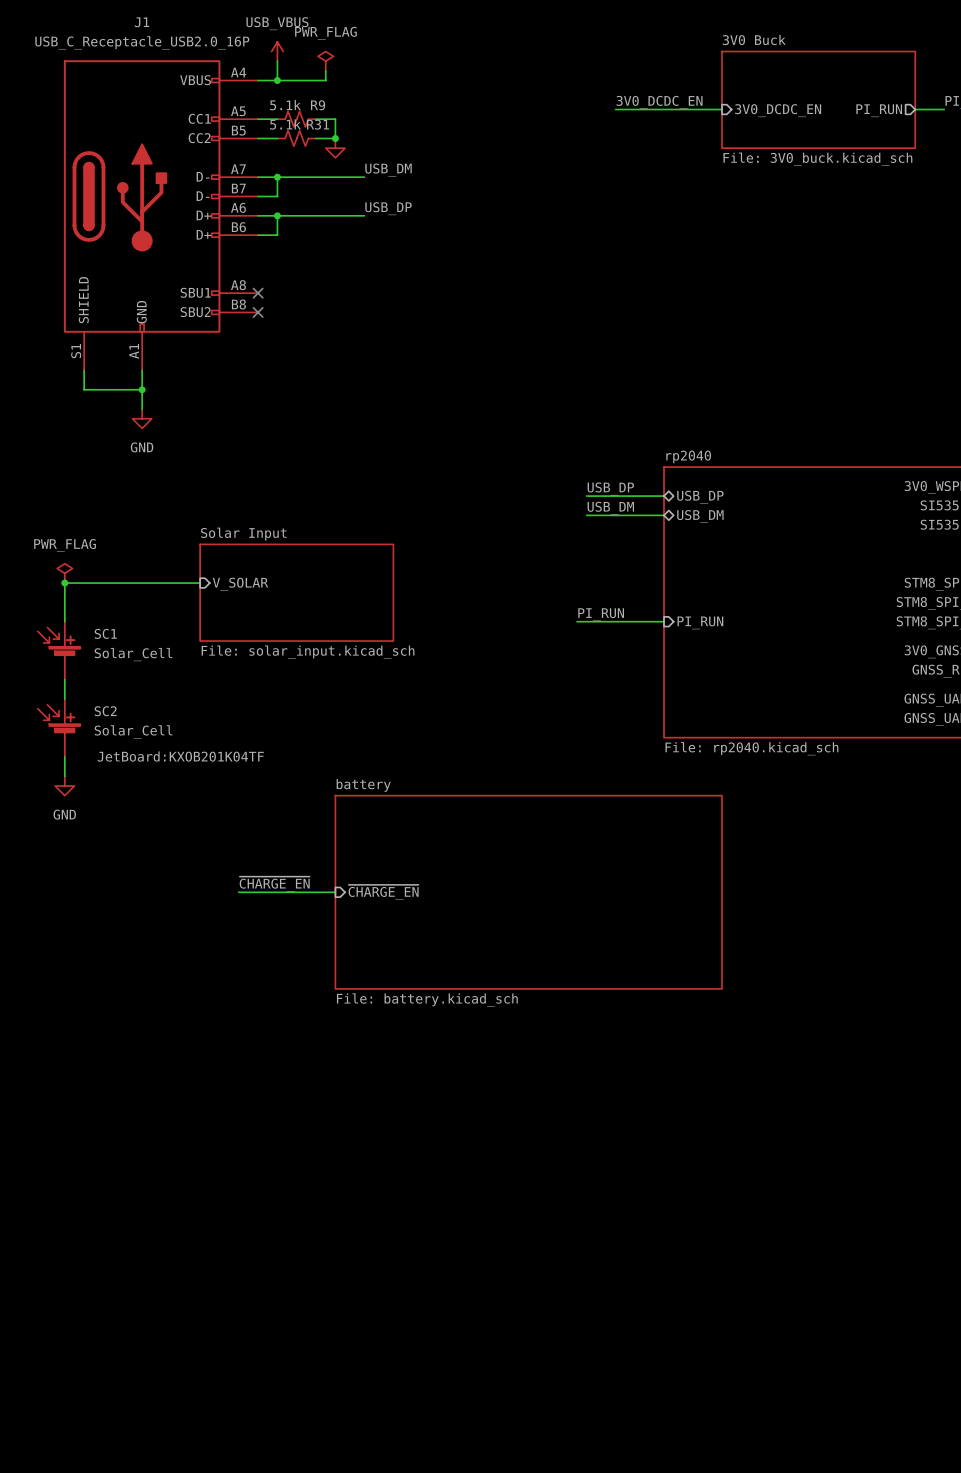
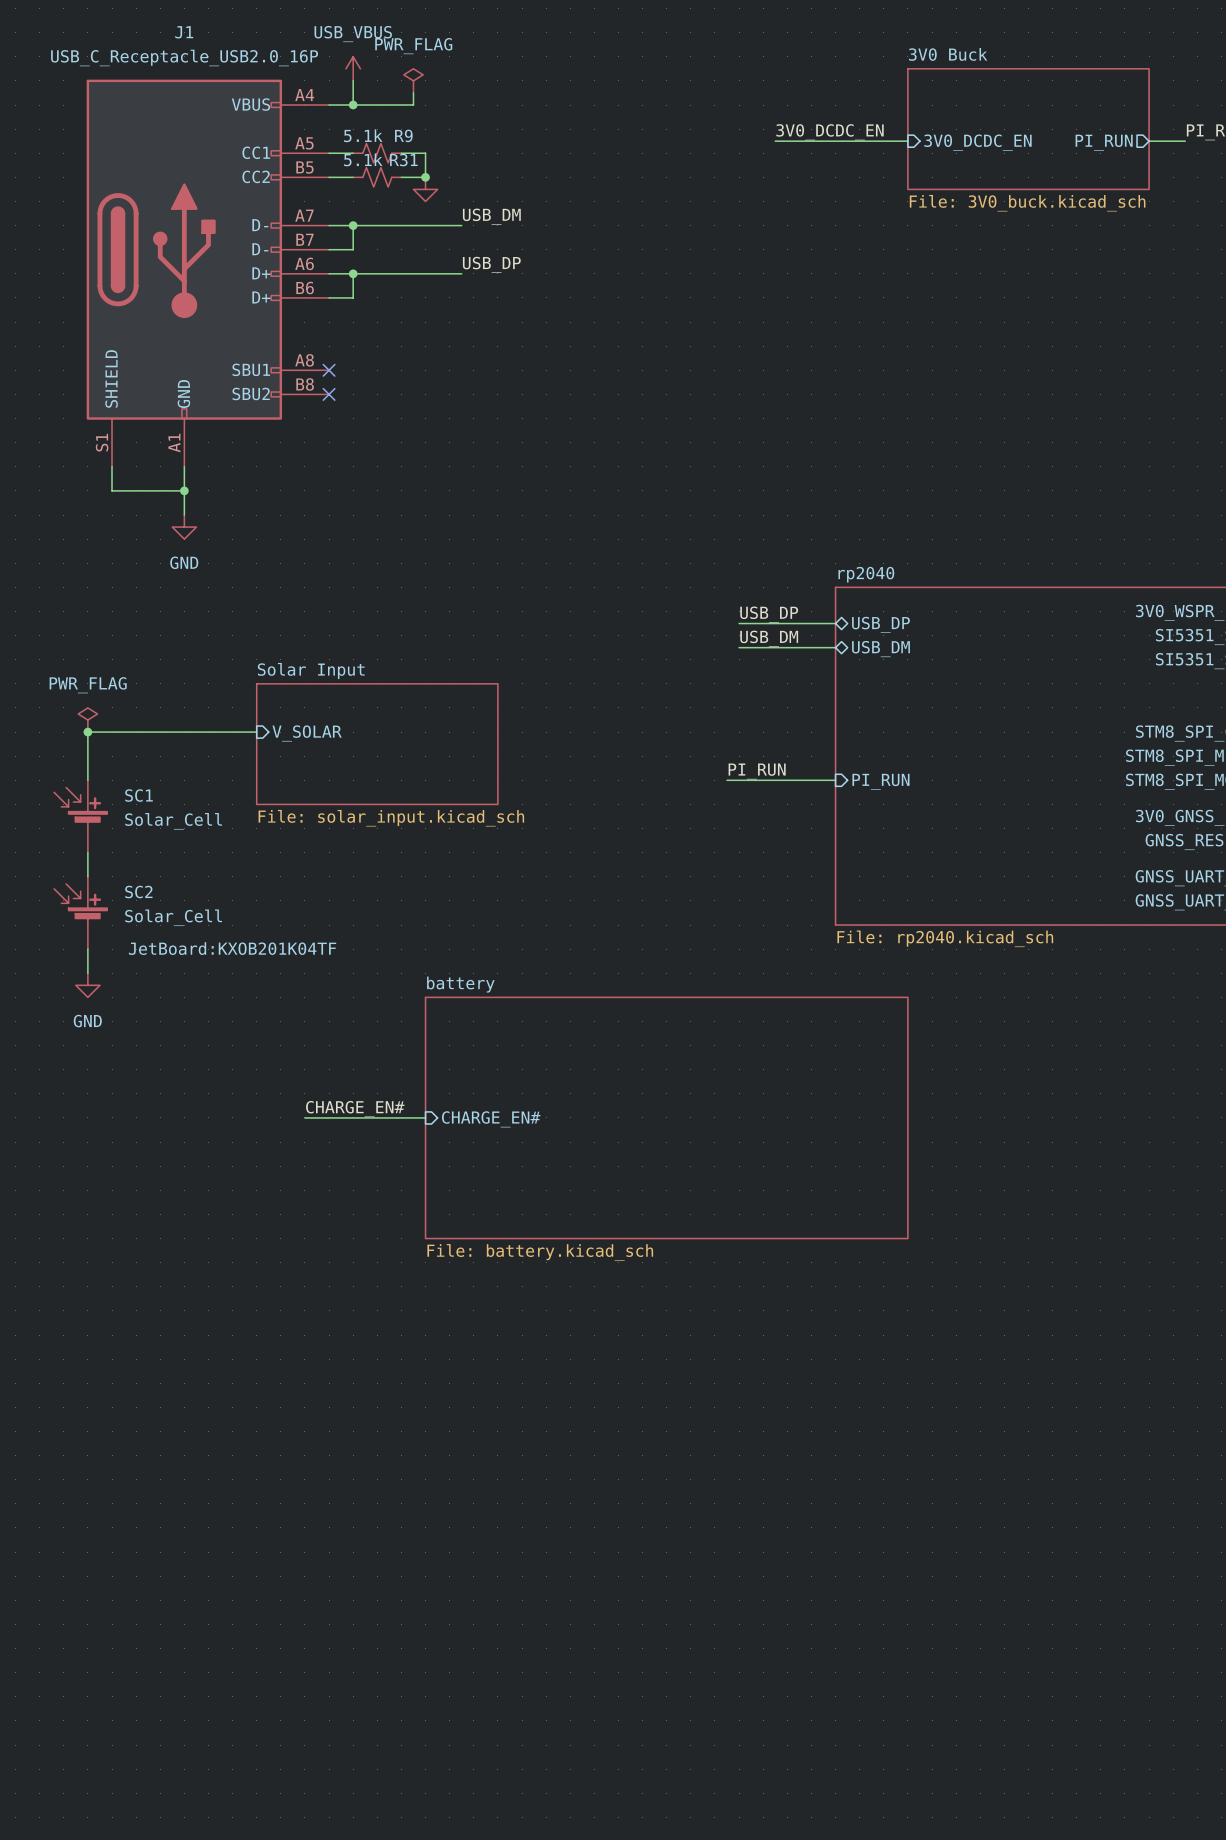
label: ~{CHARGE_EN} (274, 884) -> CHARGE_EN# (355, 1109)
sheet pin: ~{CHARGE_EN} (383, 892) -> CHARGE_EN# (491, 1119)

